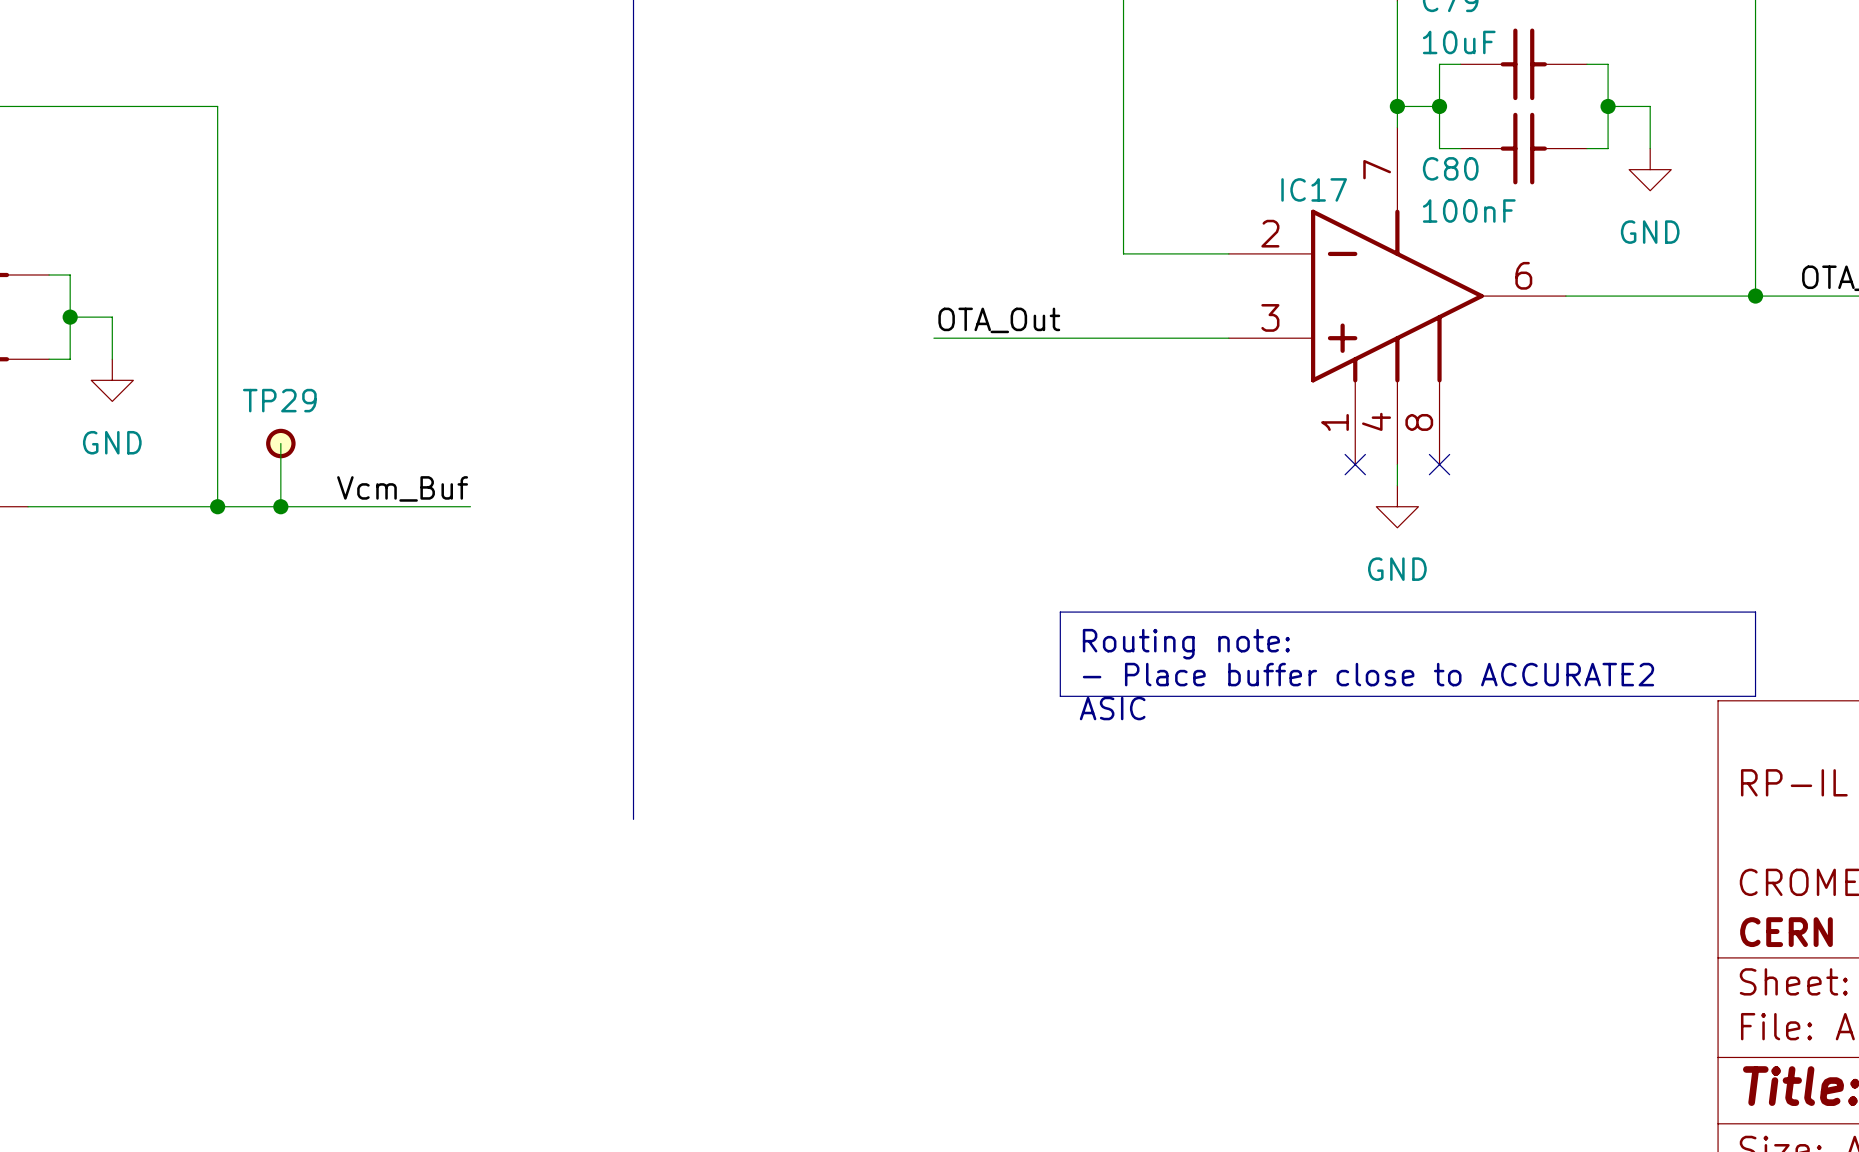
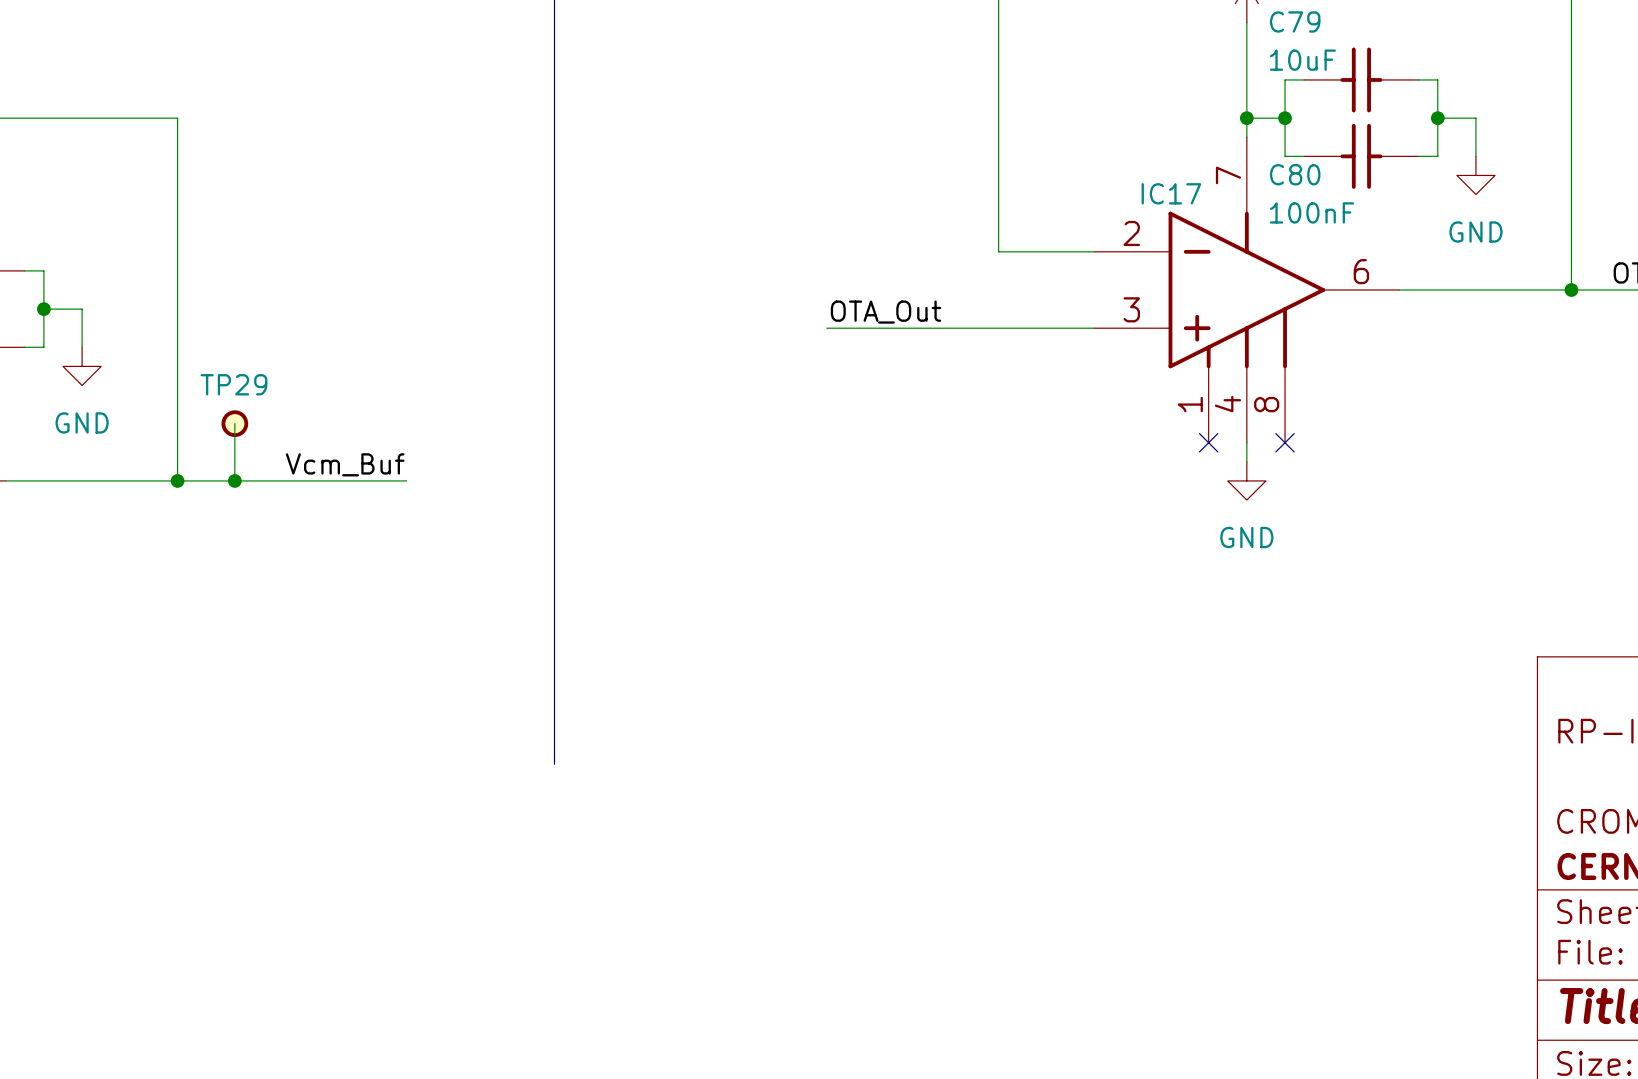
line: (1060, 612) (1755, 612) (1755, 696) (1060, 696) (1060, 612) -> none
text: Routing note: (1186, 644) -> none
text: - Place buffer close to ACCURATE2 (1368, 674) -> none
text: ASIC (1112, 708) -> none

